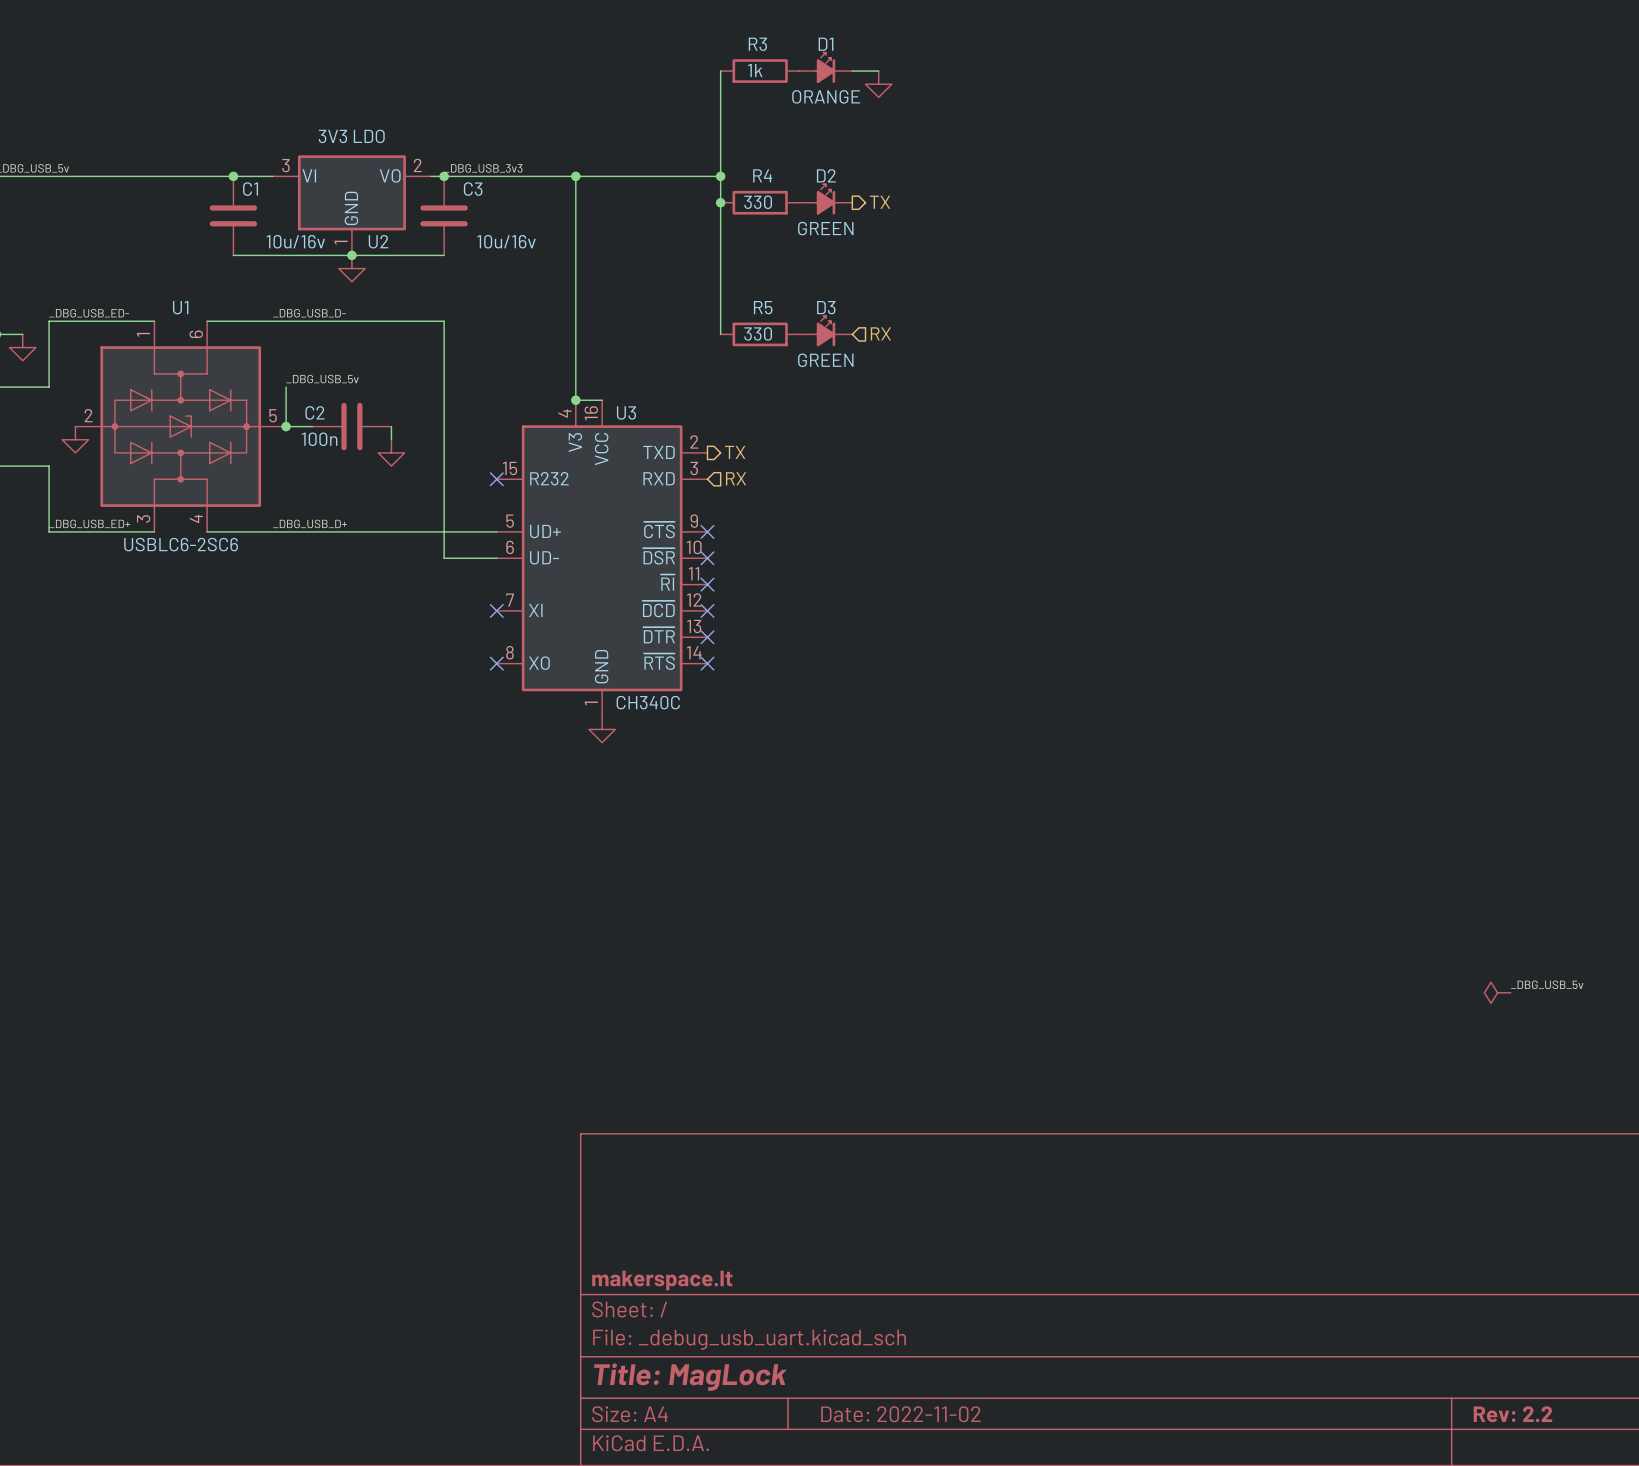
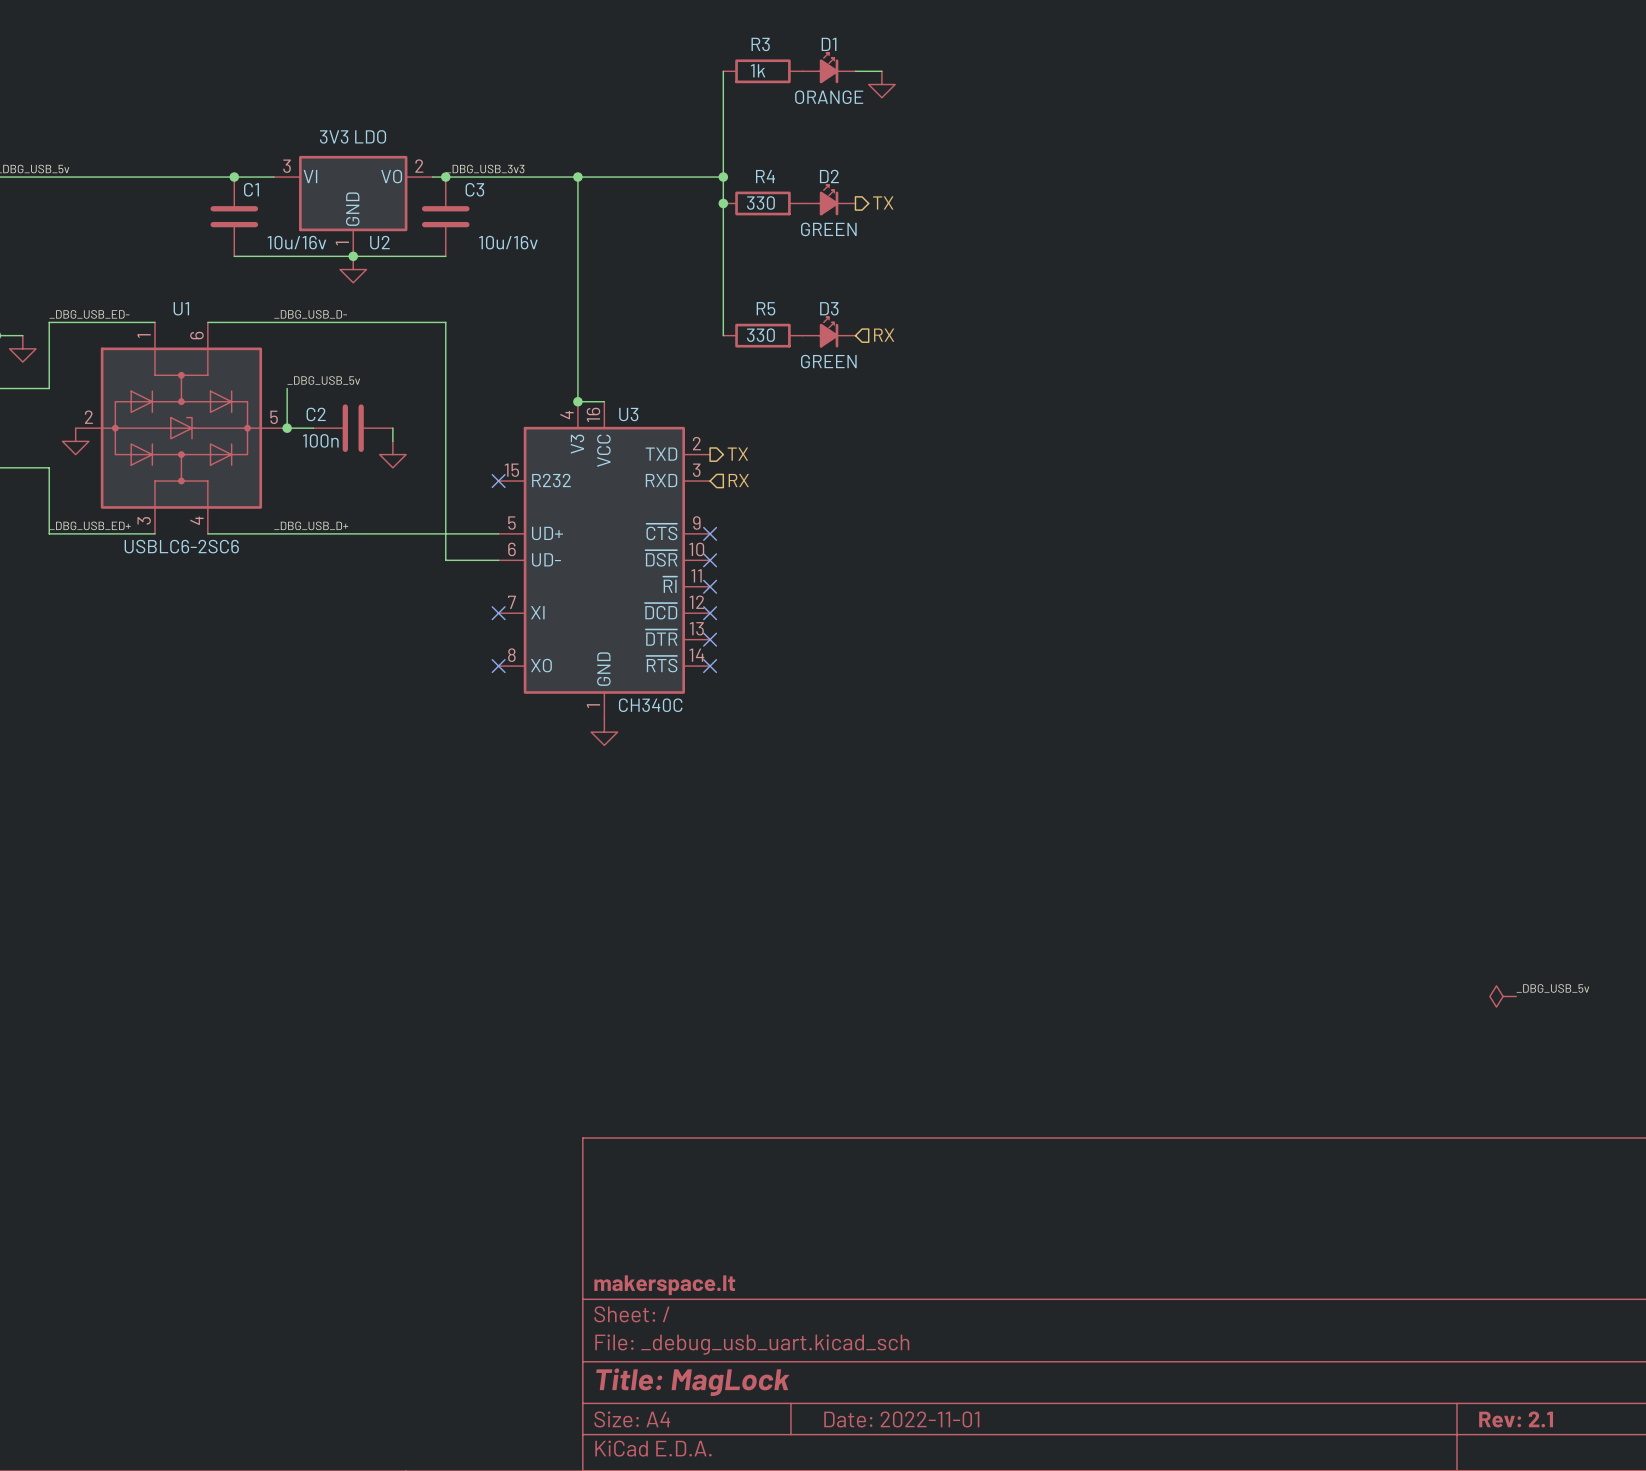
title block: Date: 2022-11-02 (900, 1414) -> Date: 2022-11-01 (901, 1419)
title block: Rev: 2.2 (1512, 1414) -> Rev: 2.1 (1516, 1419)

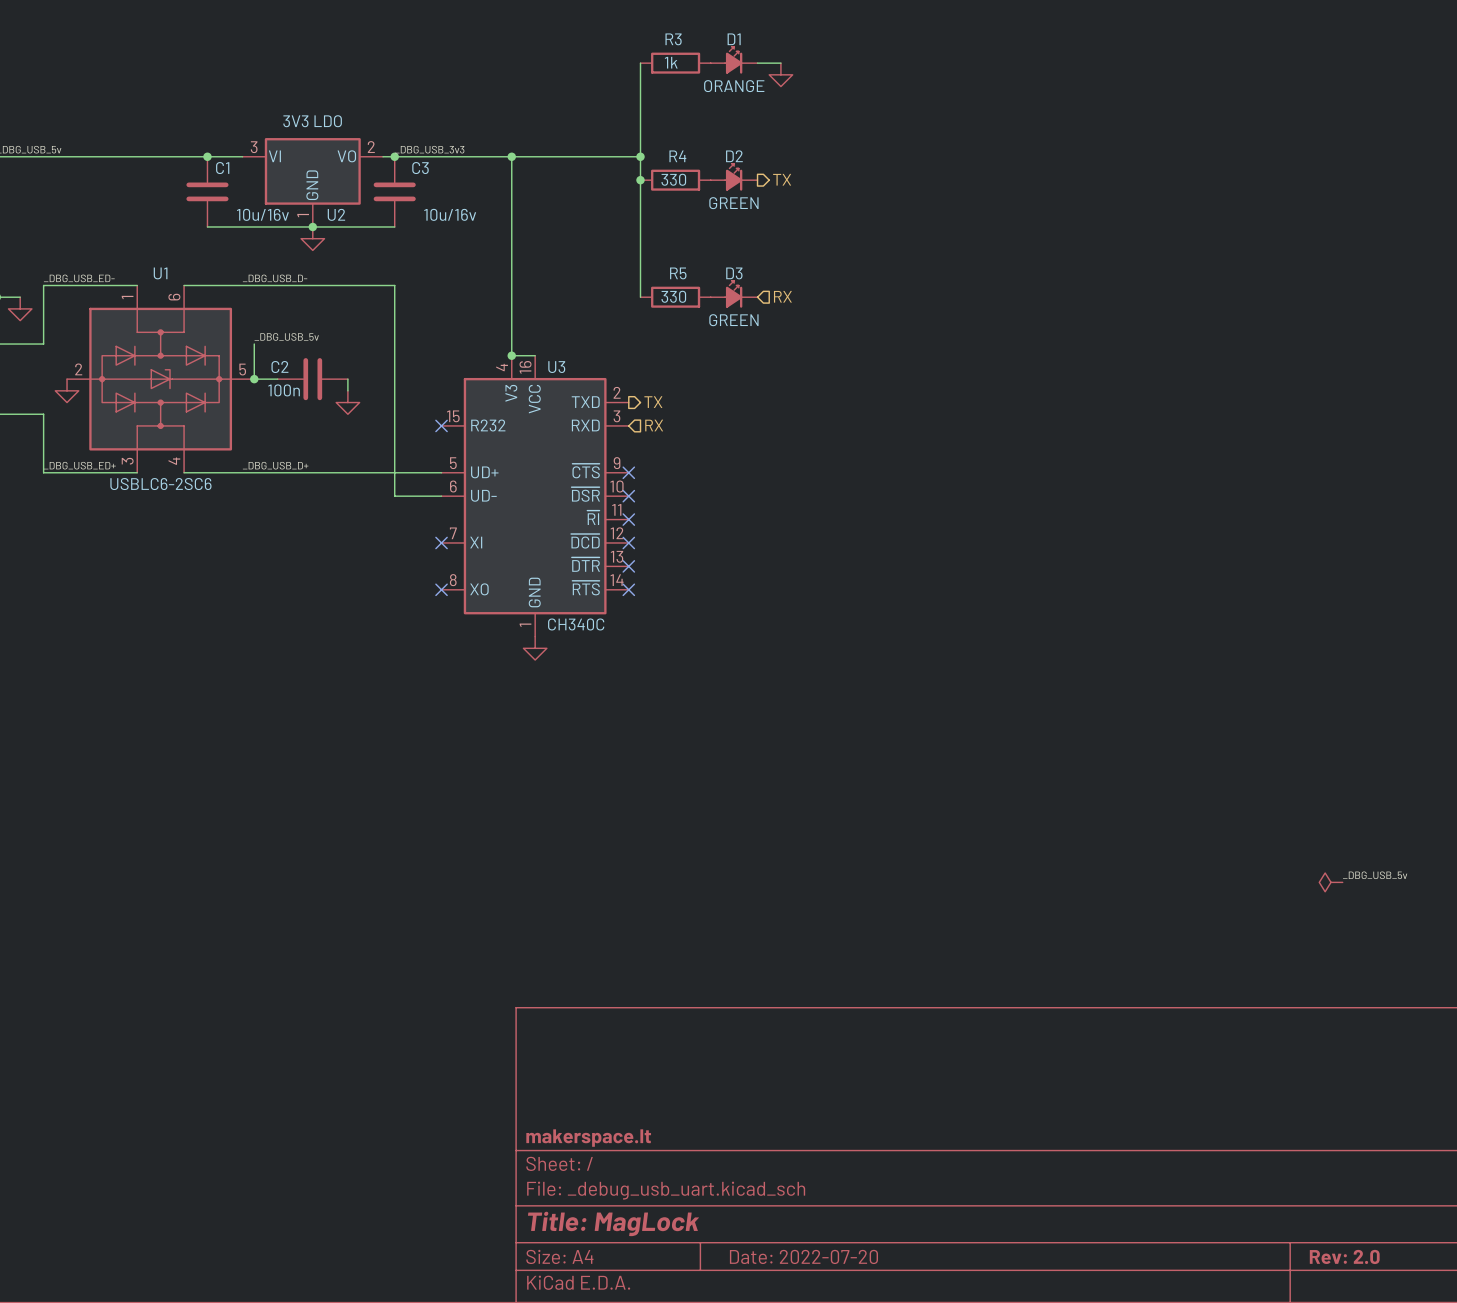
title block: Date: 2022-11-01 (901, 1419) -> Date: 2022-07-20 (803, 1256)
title block: Rev: 2.1 (1516, 1419) -> Rev: 2.0 (1344, 1256)

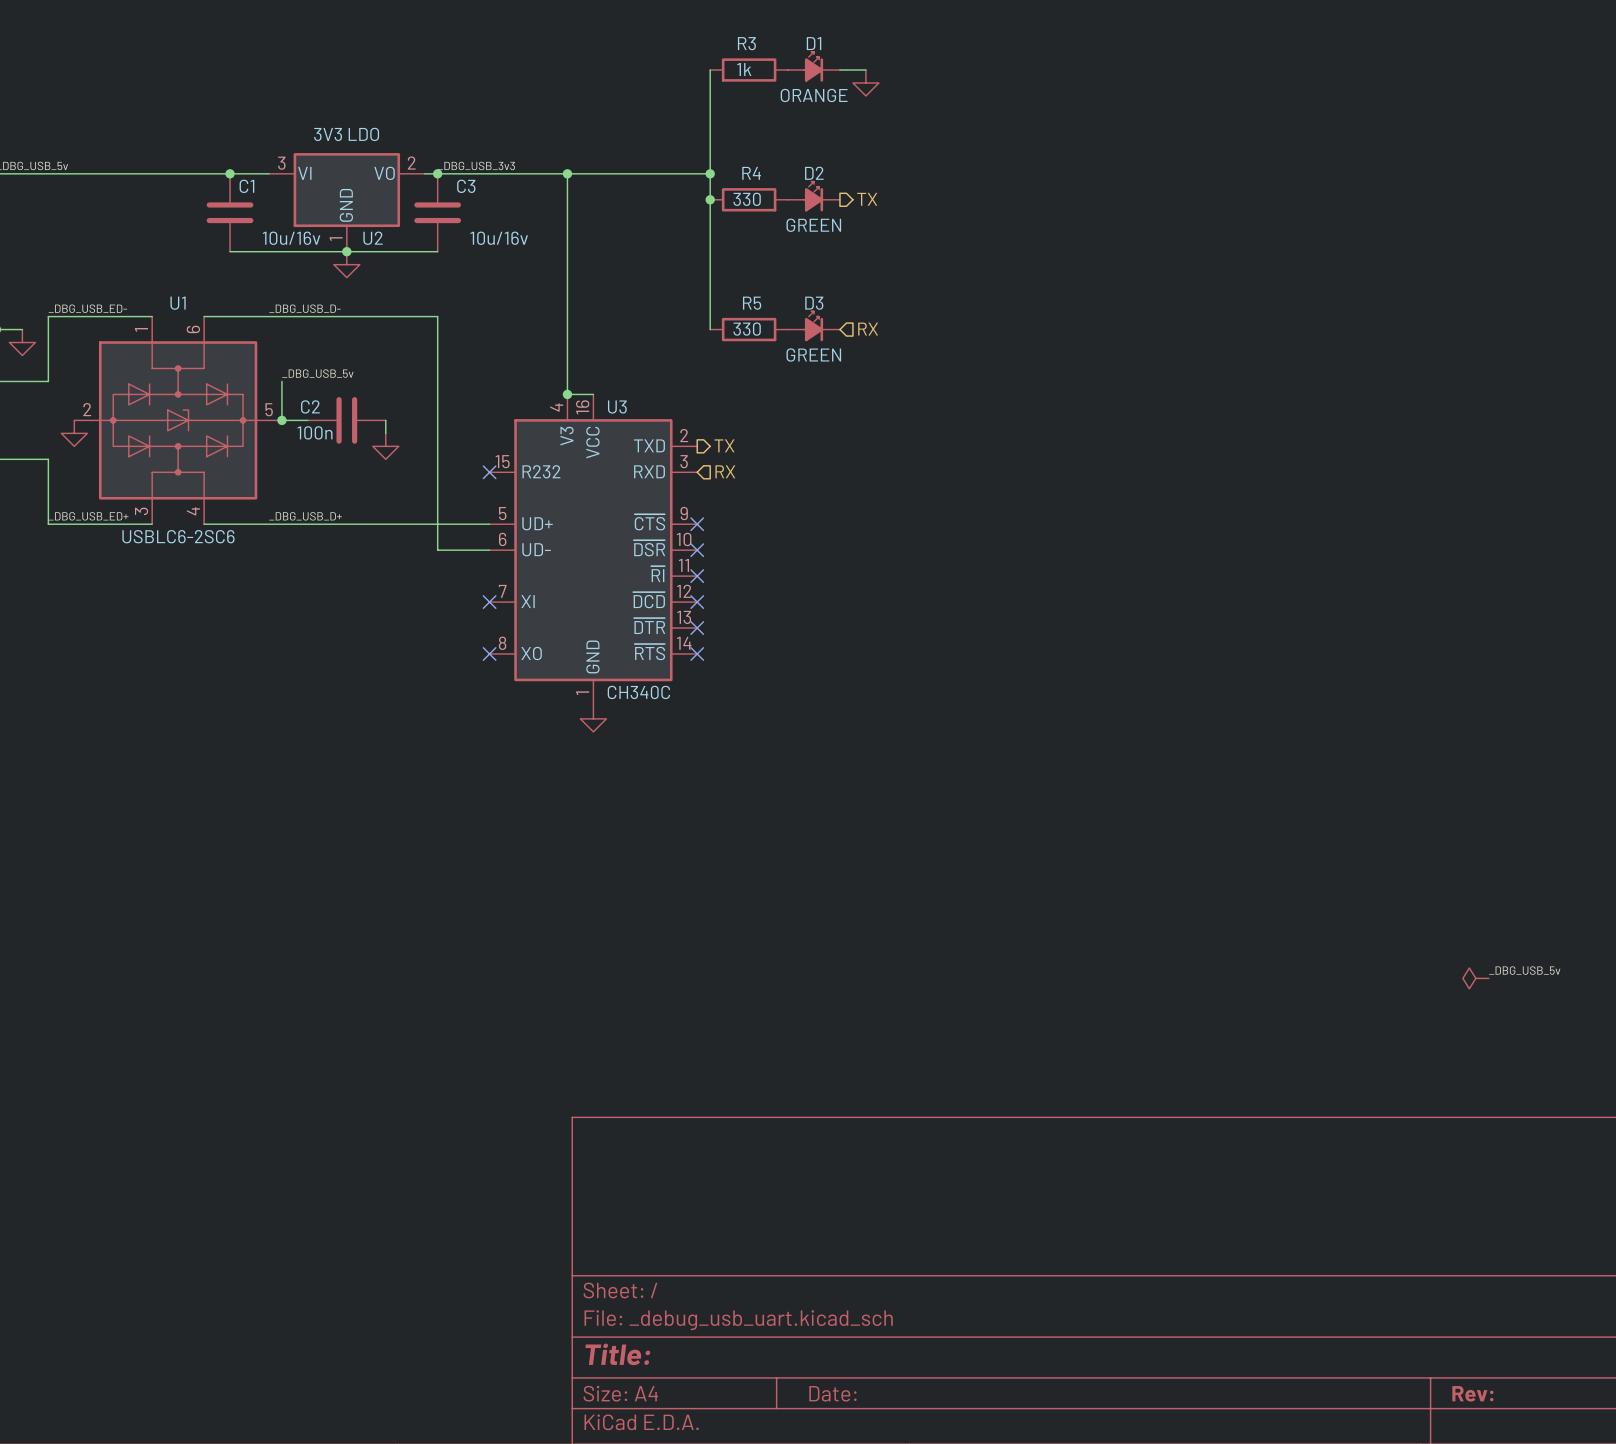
title block: makerspace.lt (588, 1138) -> none
title block: Title: MagLock (613, 1223) -> Title: (617, 1354)
title block: Date: 2022-07-20 (803, 1256) -> Date: (832, 1393)
title block: Rev: 2.0 (1344, 1256) -> Rev: (1472, 1393)

